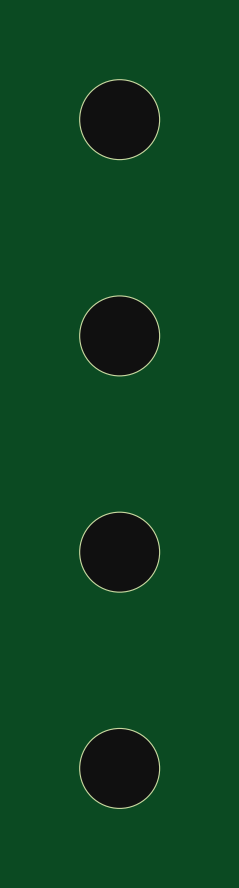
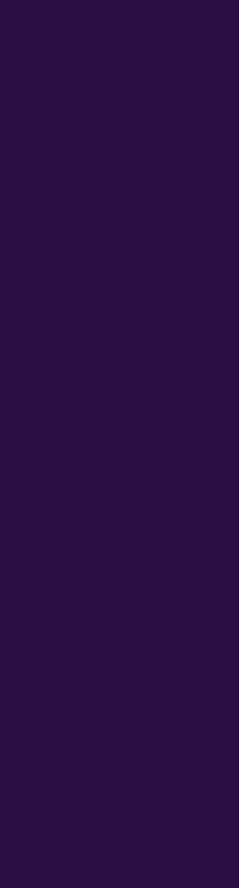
part: (119, 119) -> none
part: (119, 335) -> none
part: (119, 552) -> none
part: (119, 768) -> none

